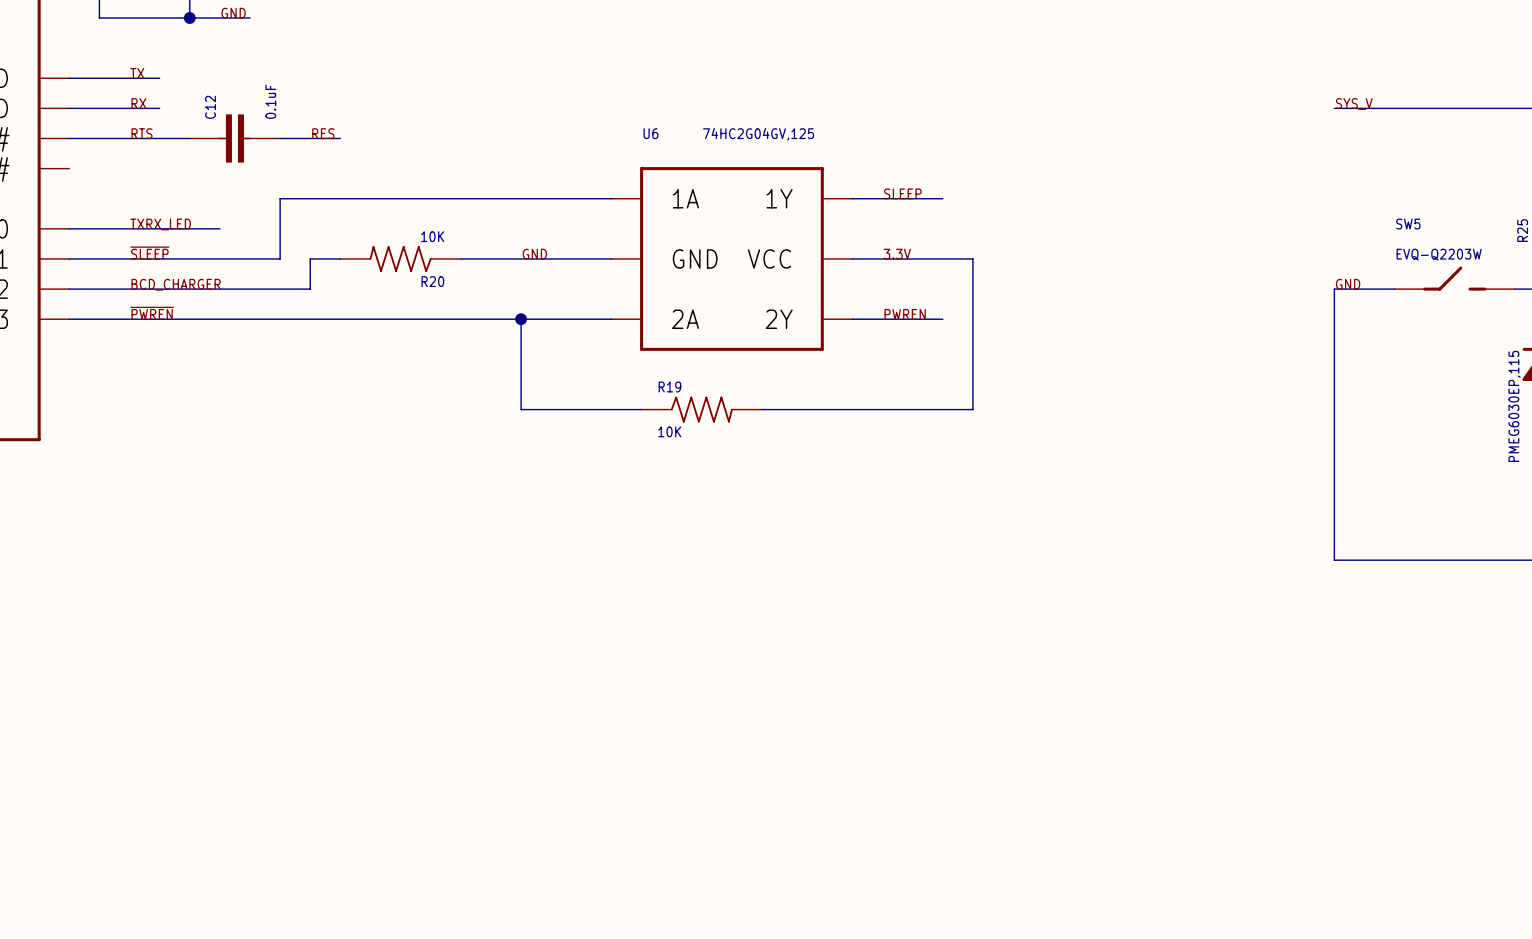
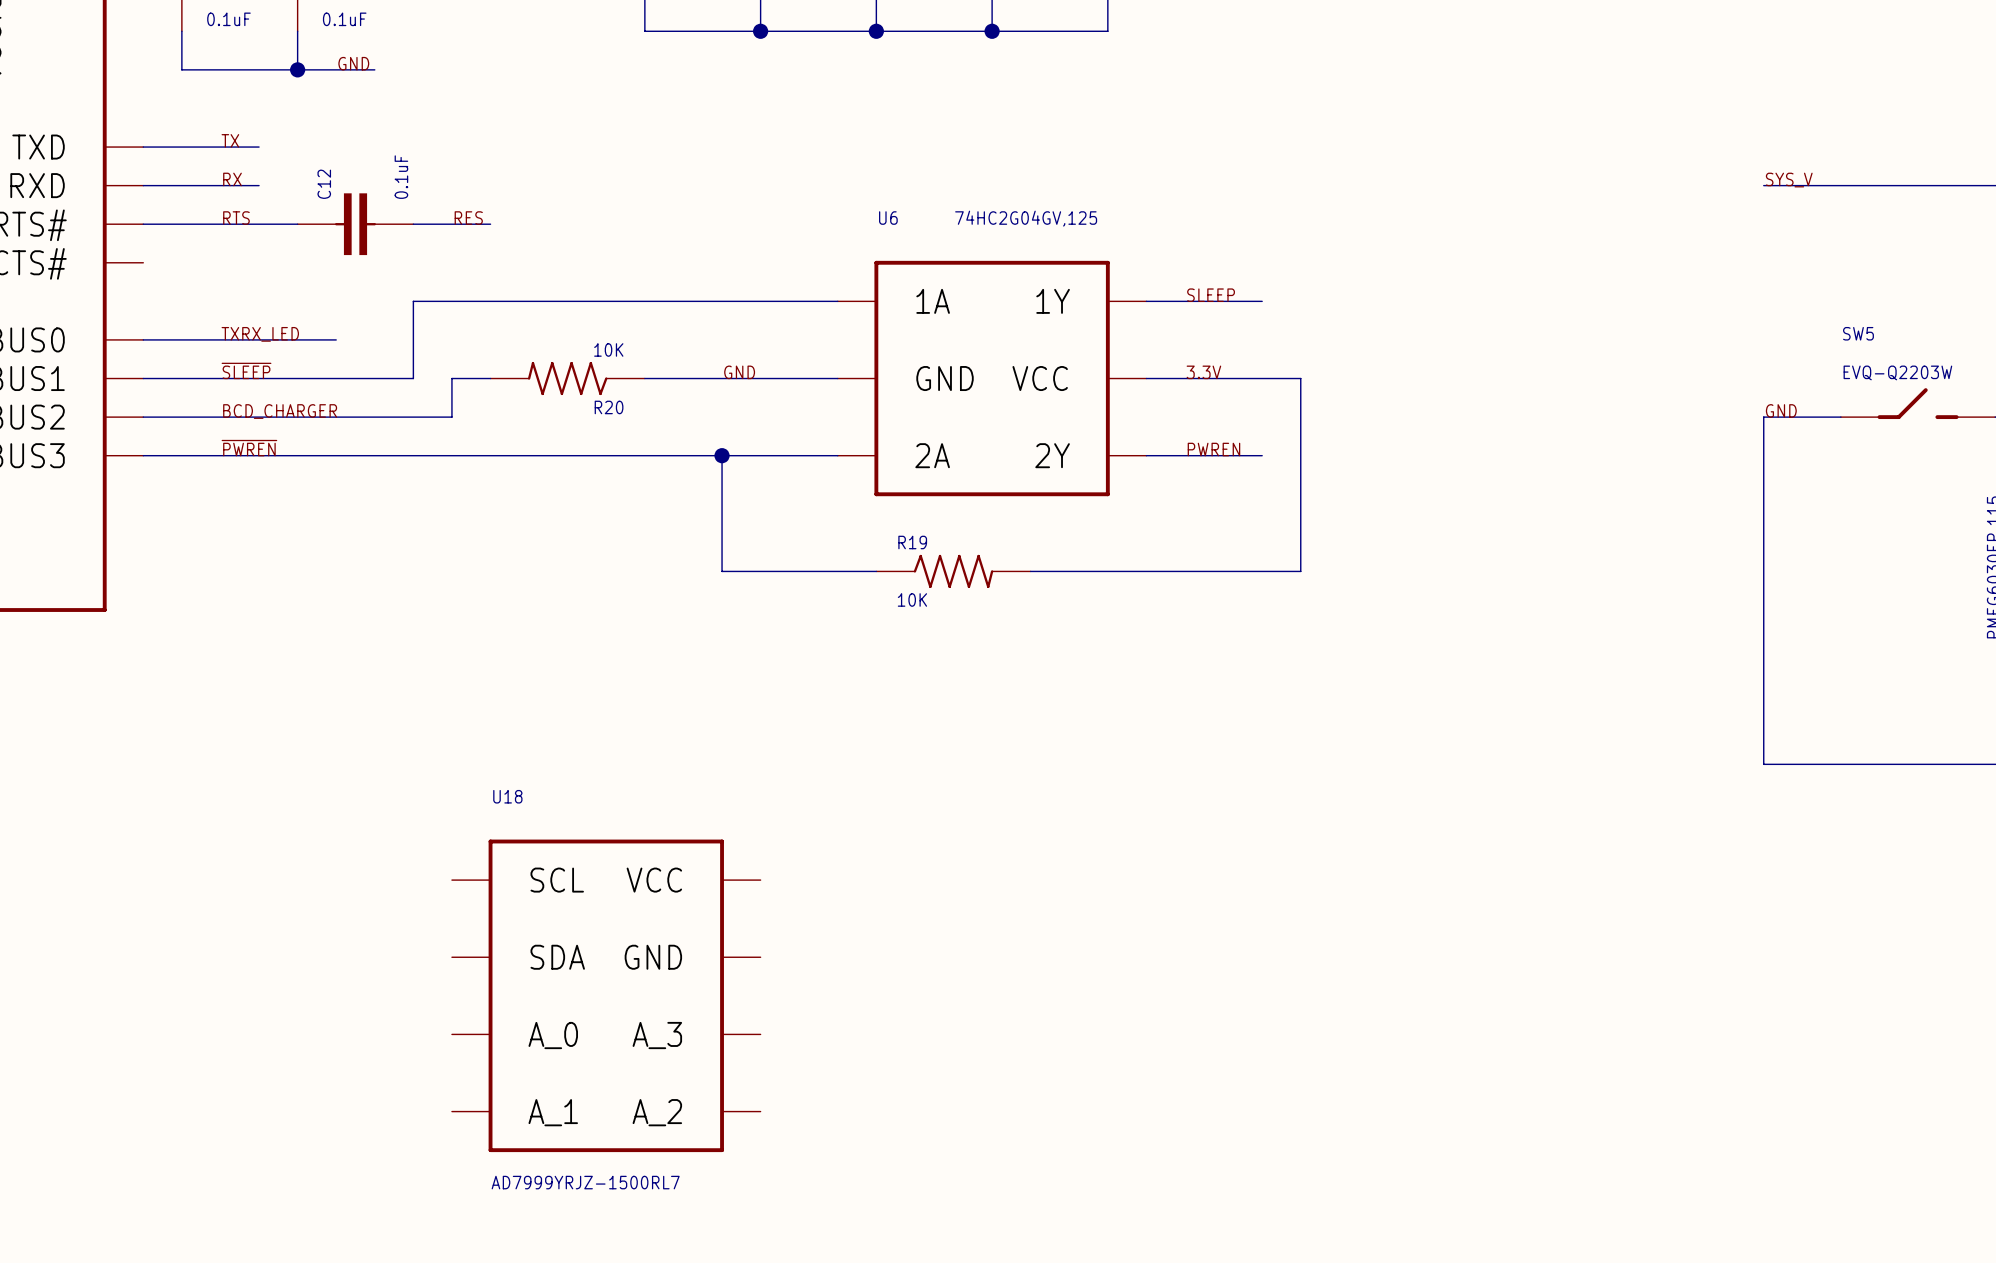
U18: none -> AD7999YRJZ-1500RL7 (606, 995)

